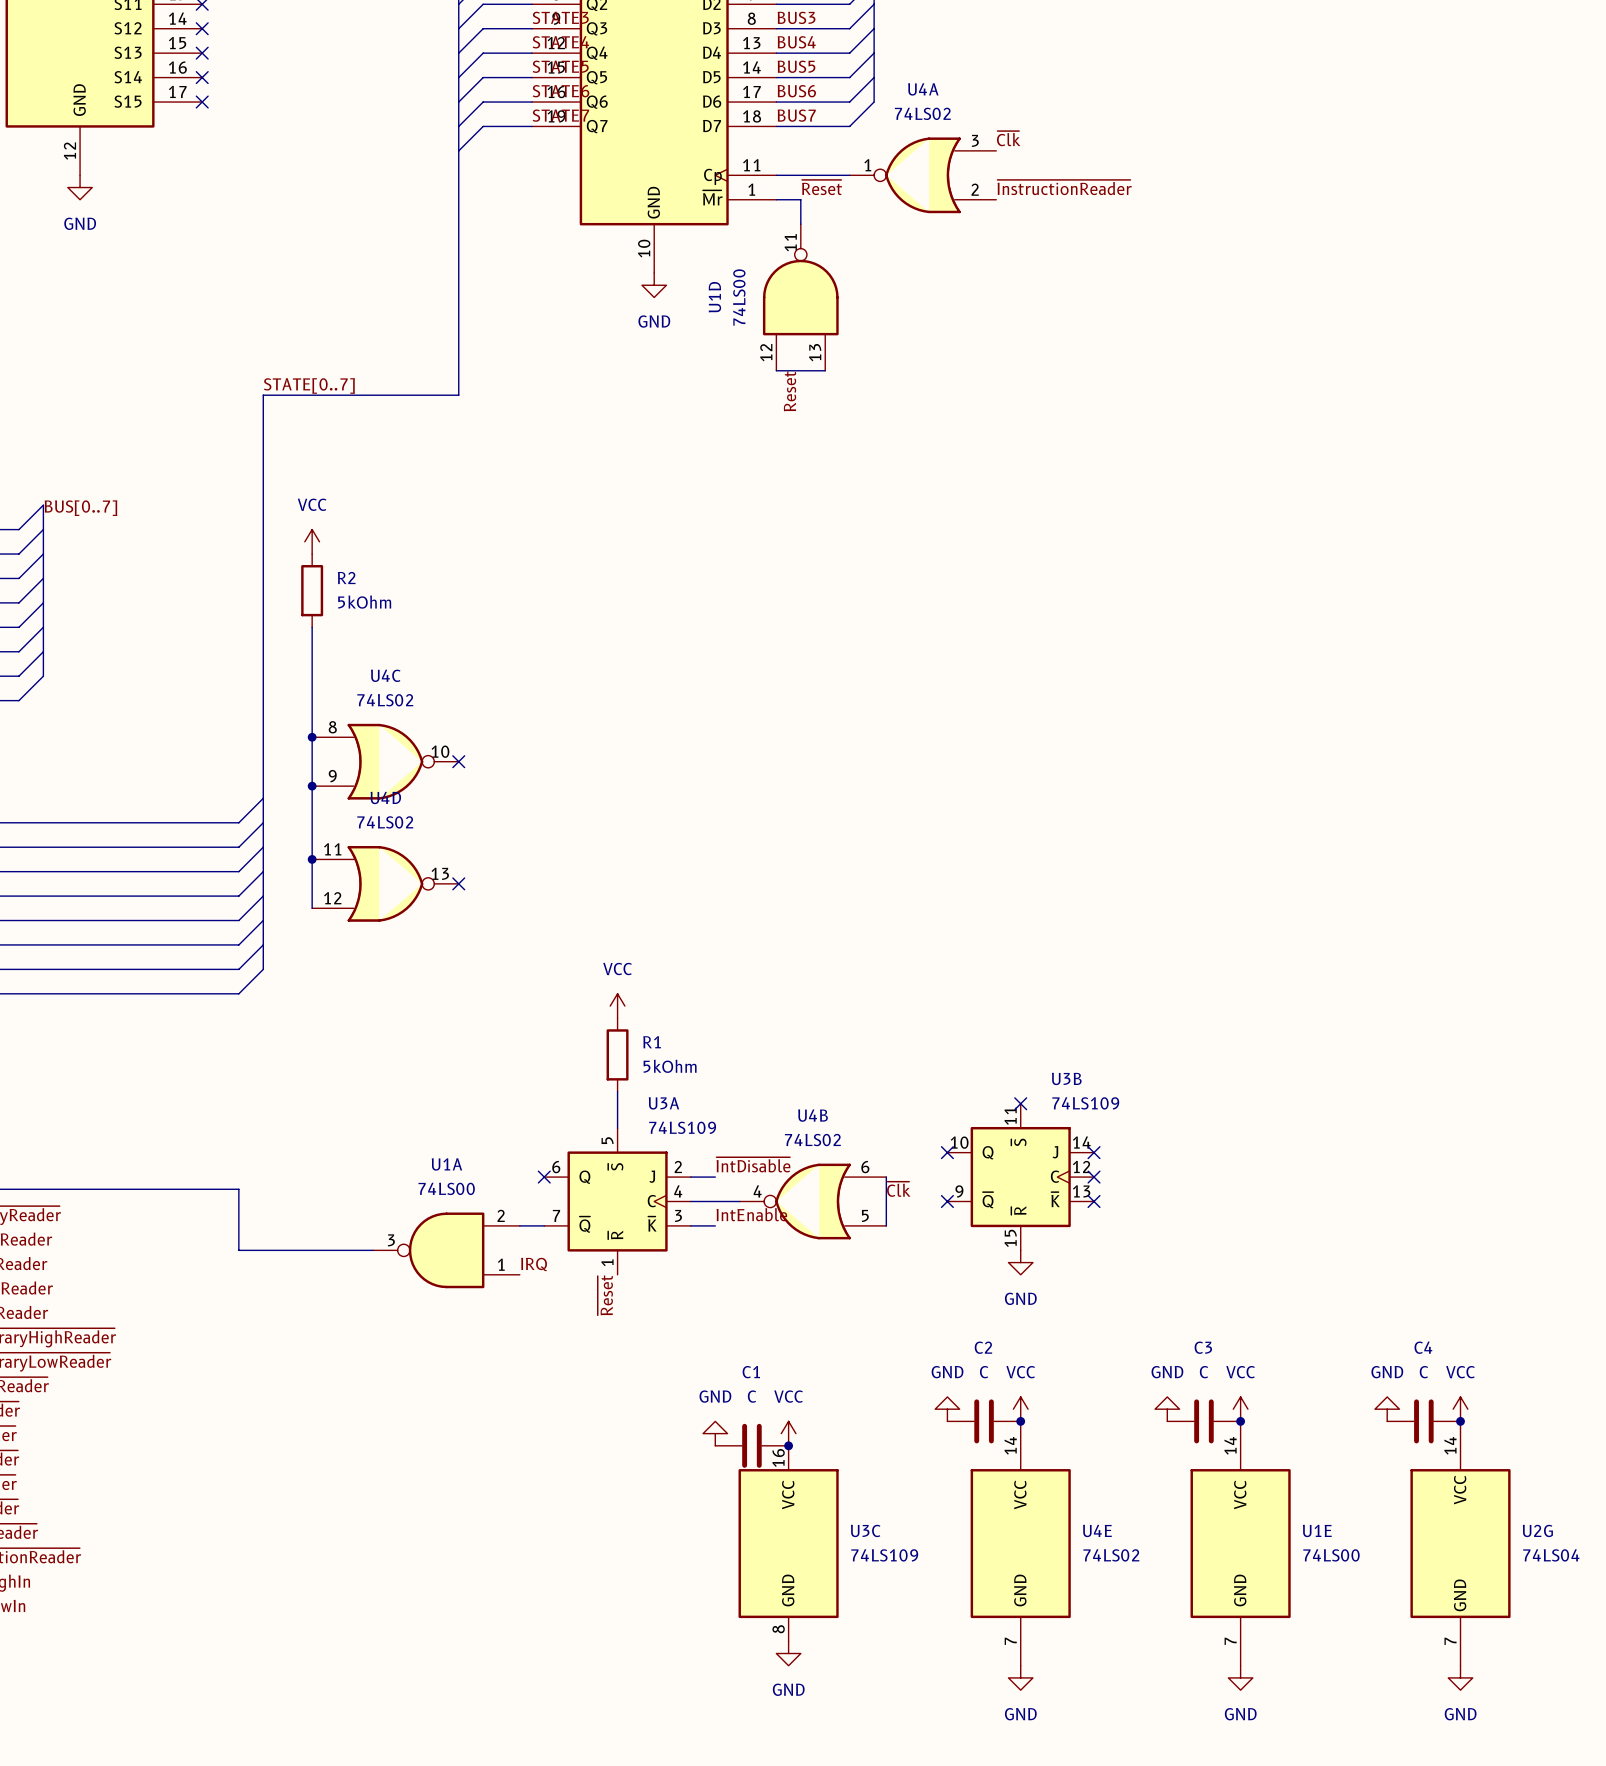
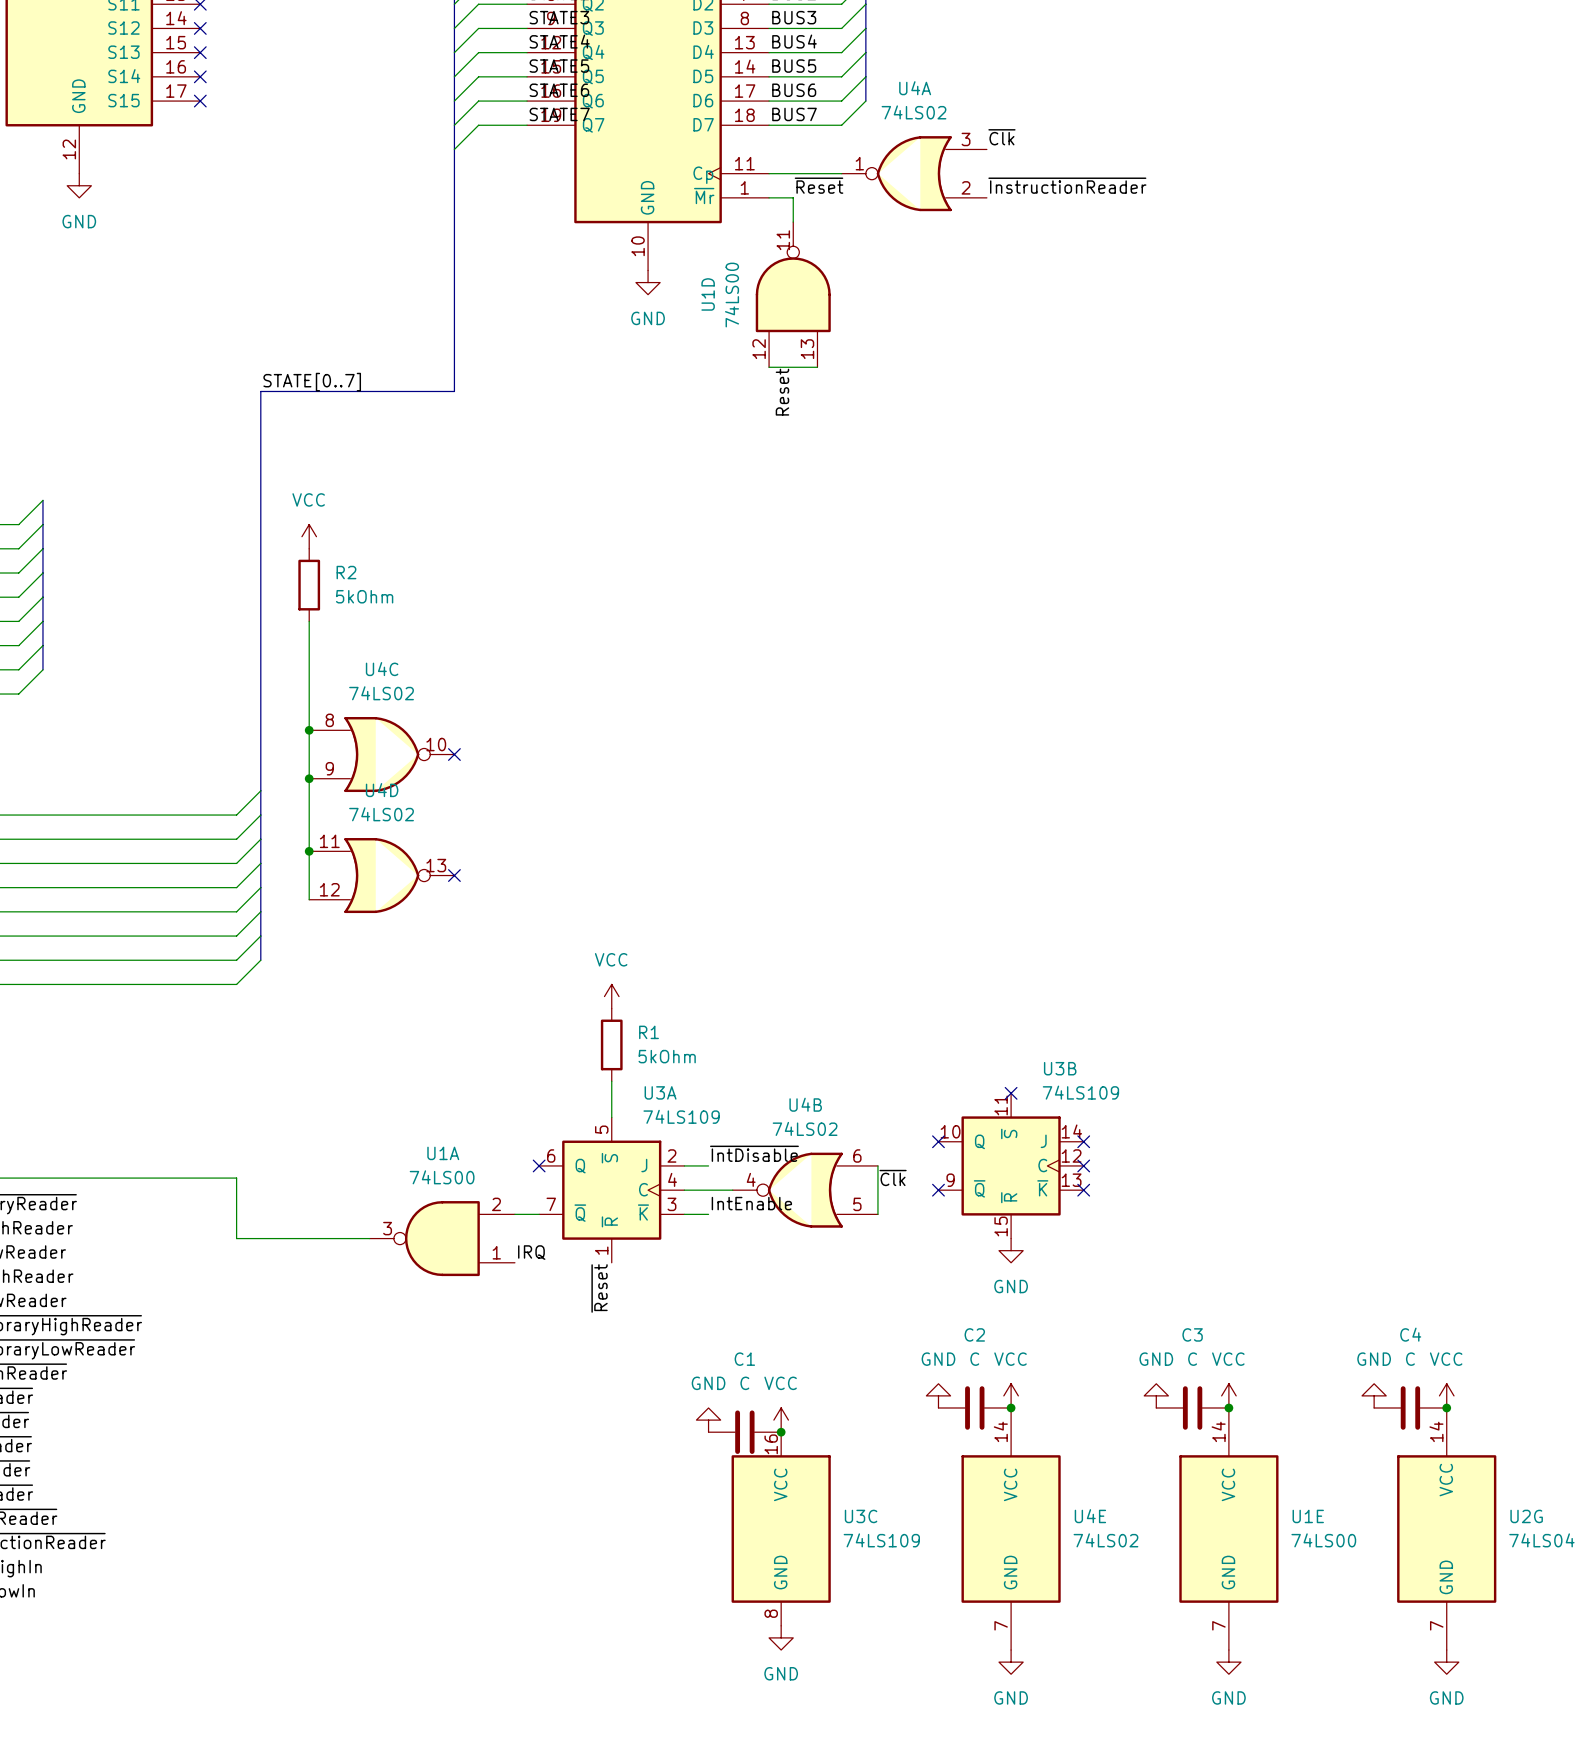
label: BUS[0..7] (81, 508) -> none

